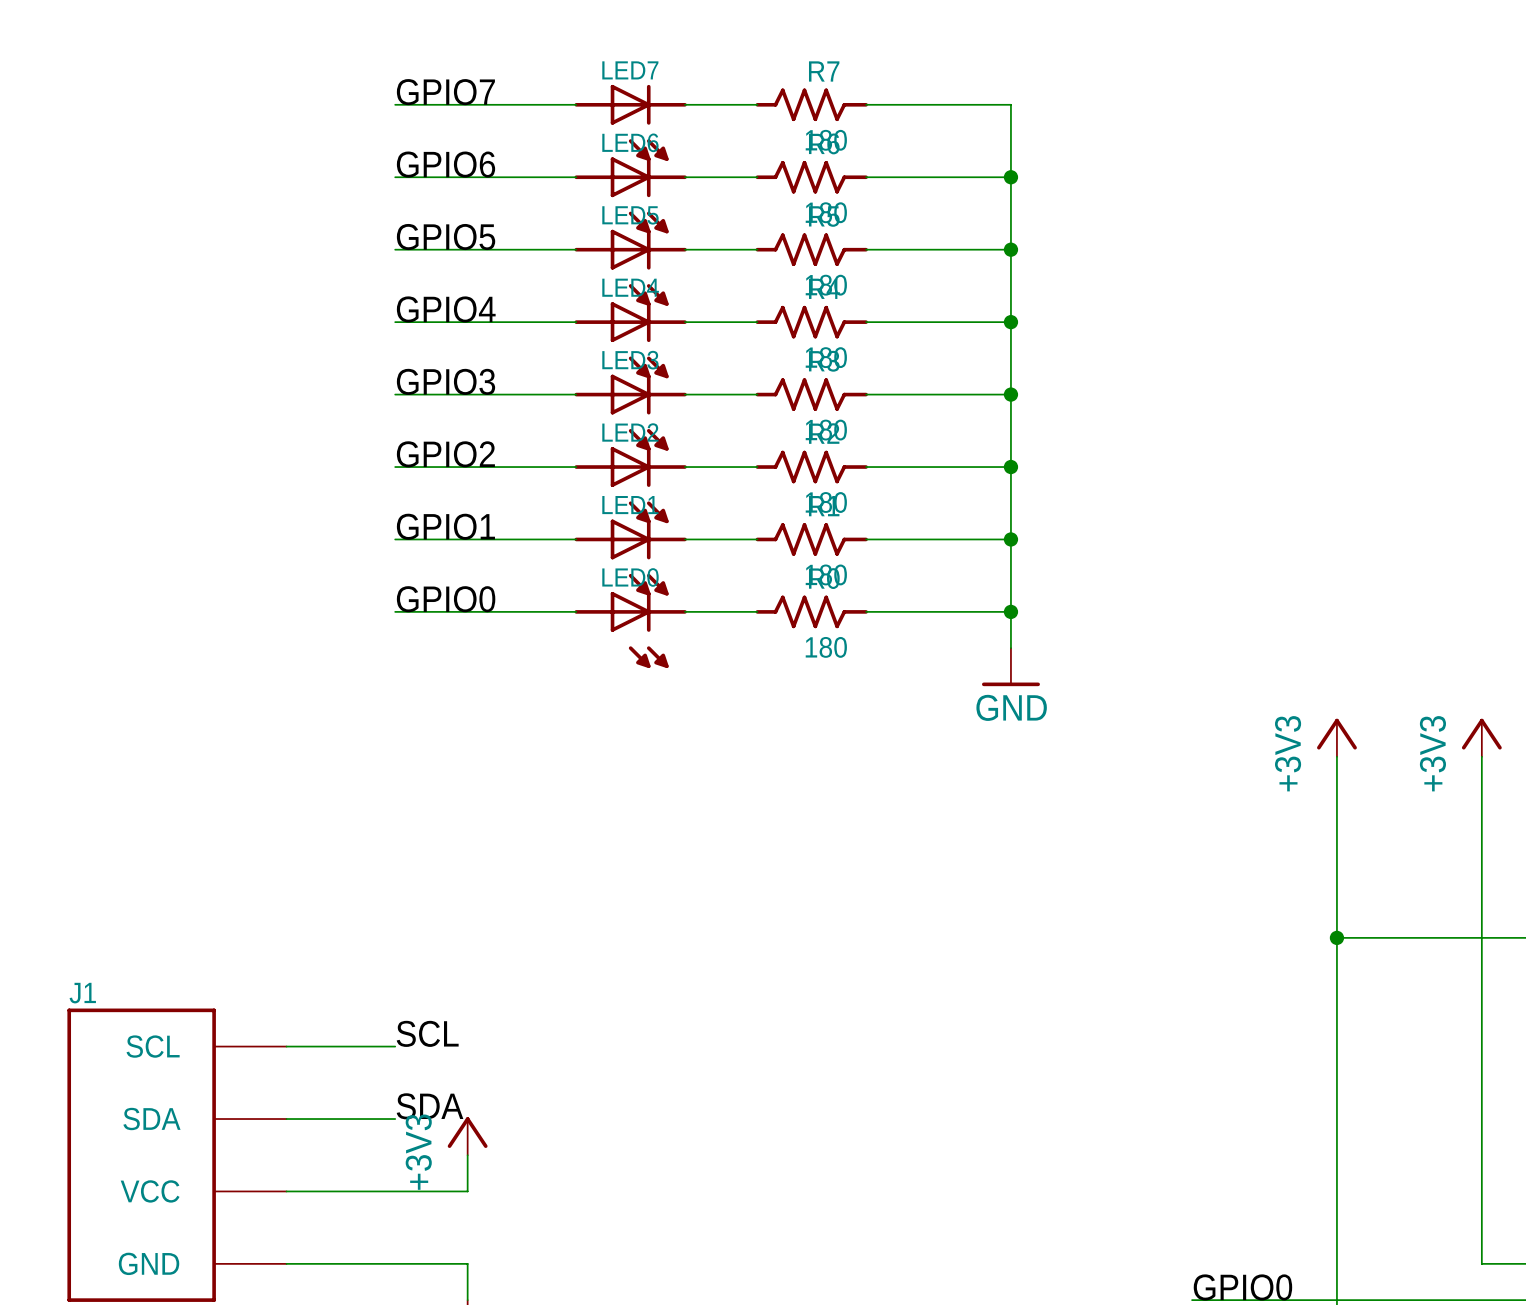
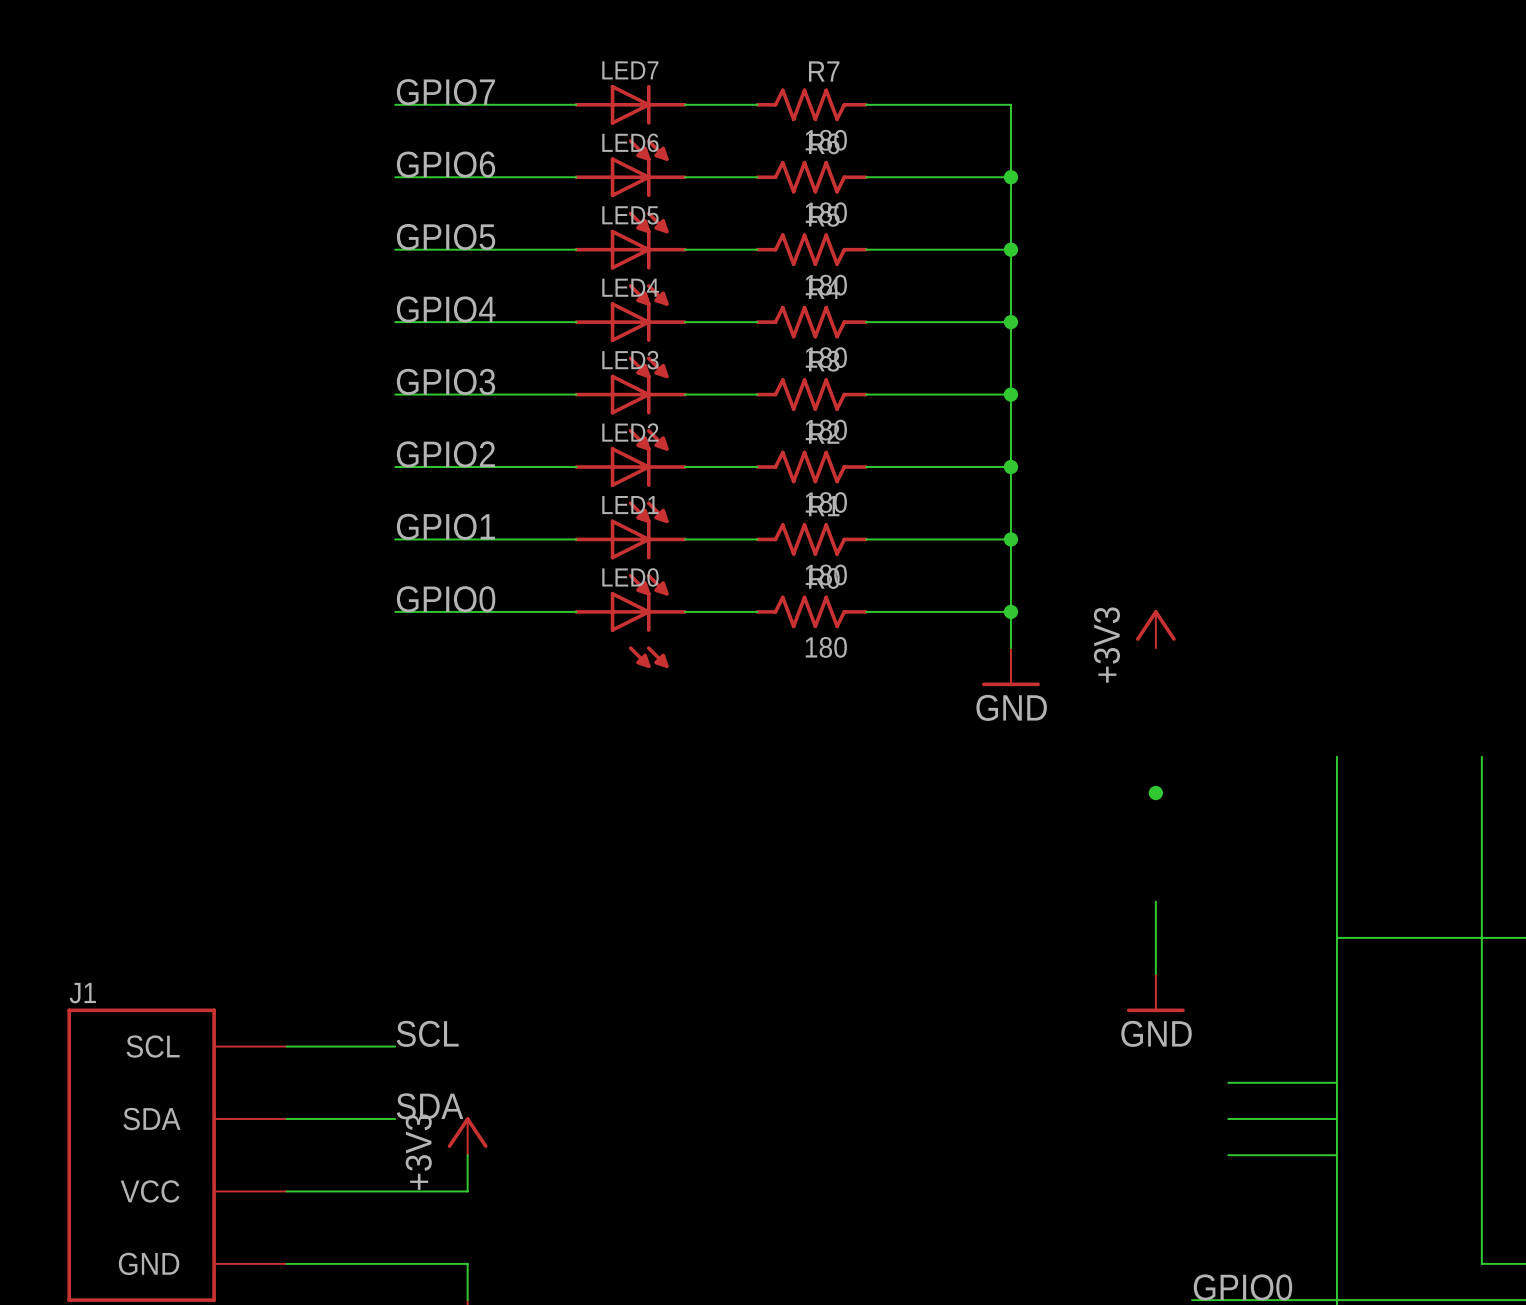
power symbol: none -> +3V3 (1155, 629)
power symbol: +3V3 (1336, 737) -> none
power symbol: +3V3 (1481, 737) -> none
junction: none -> (1155, 793)
wire: none -> (1155, 901) (1155, 974)
junction: (1336, 937) -> none
power symbol: none -> GND (1155, 993)
wire: none -> (1228, 1082) (1336, 1082)
wire: none -> (1228, 1119) (1336, 1119)
wire: none -> (1228, 1155) (1336, 1155)

